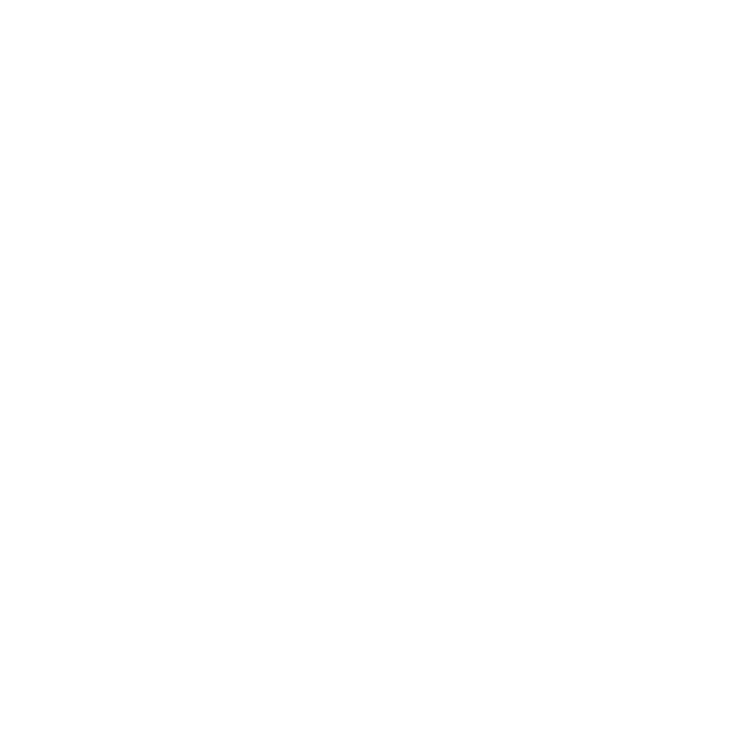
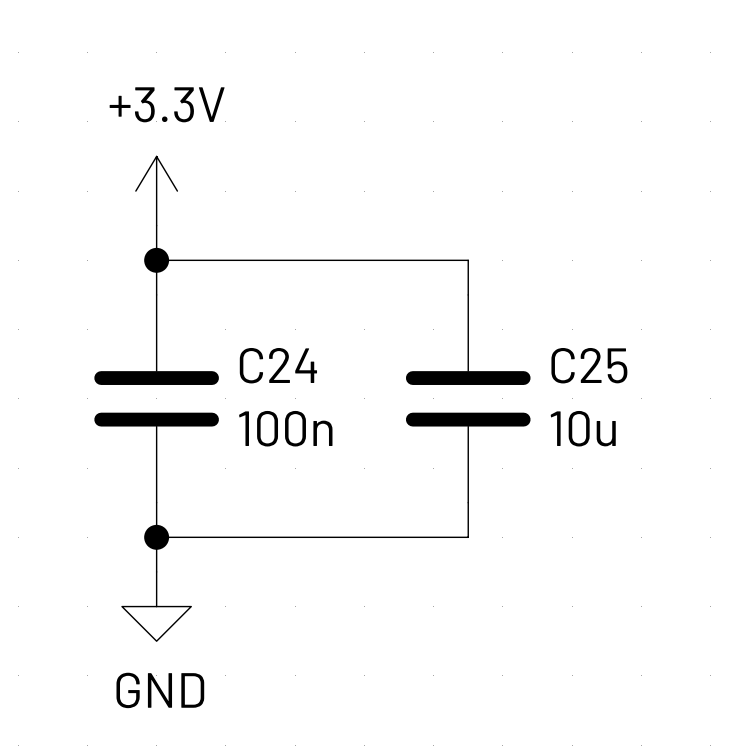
power symbol: none -> +3.3V (156, 191)
wire: none -> (156, 225) (156, 294)
wire: none -> (156, 260) (468, 260) (468, 294)
junction: none -> (156, 260)
C24: none -> 100n (156, 398)
C25: none -> 10u (468, 398)
wire: none -> (156, 502) (156, 571)
wire: none -> (468, 502) (468, 537) (156, 537)
junction: none -> (156, 537)
power symbol: none -> GND (156, 606)

